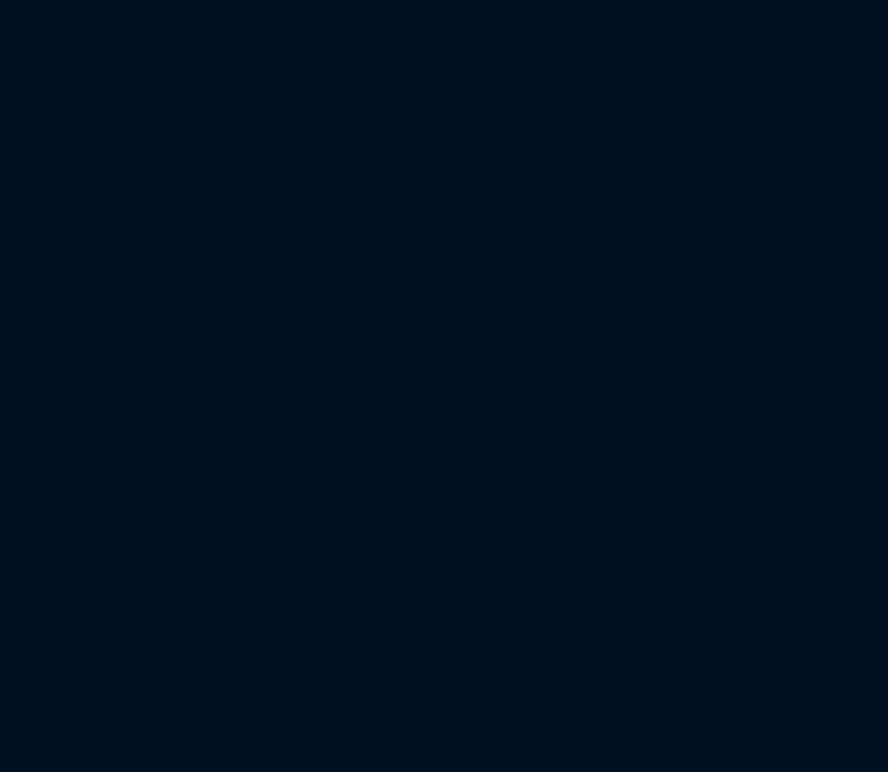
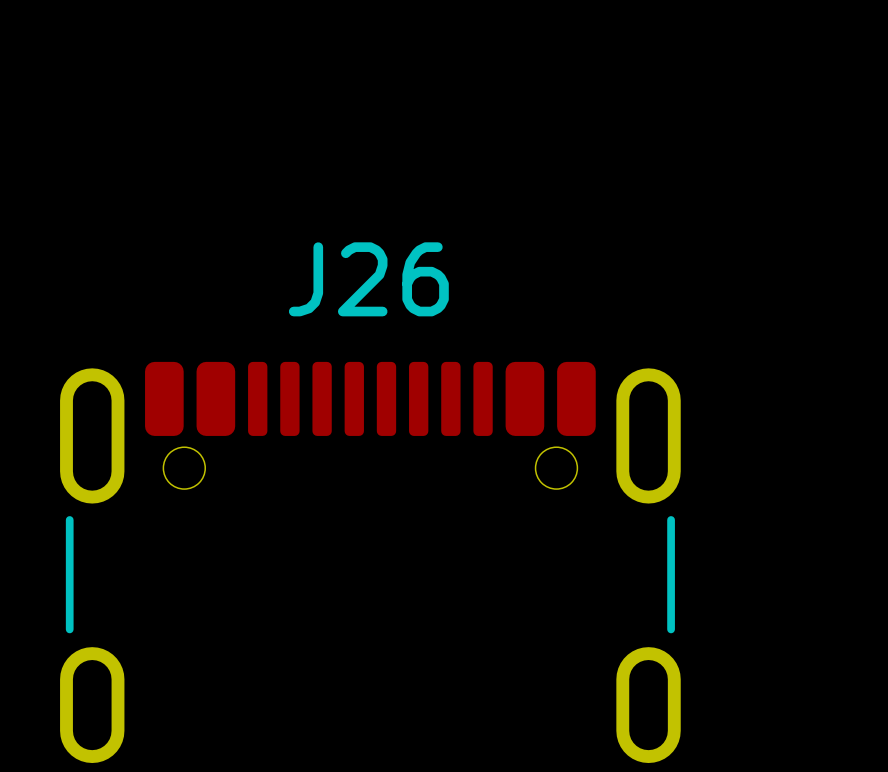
J26: none -> (370, 562)

